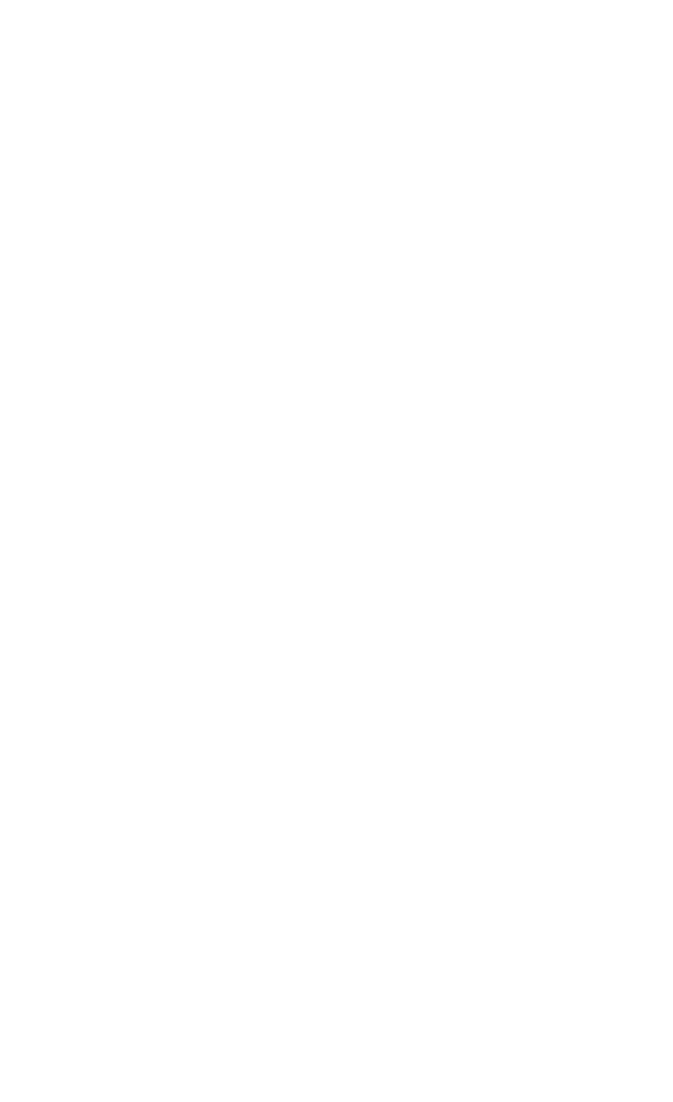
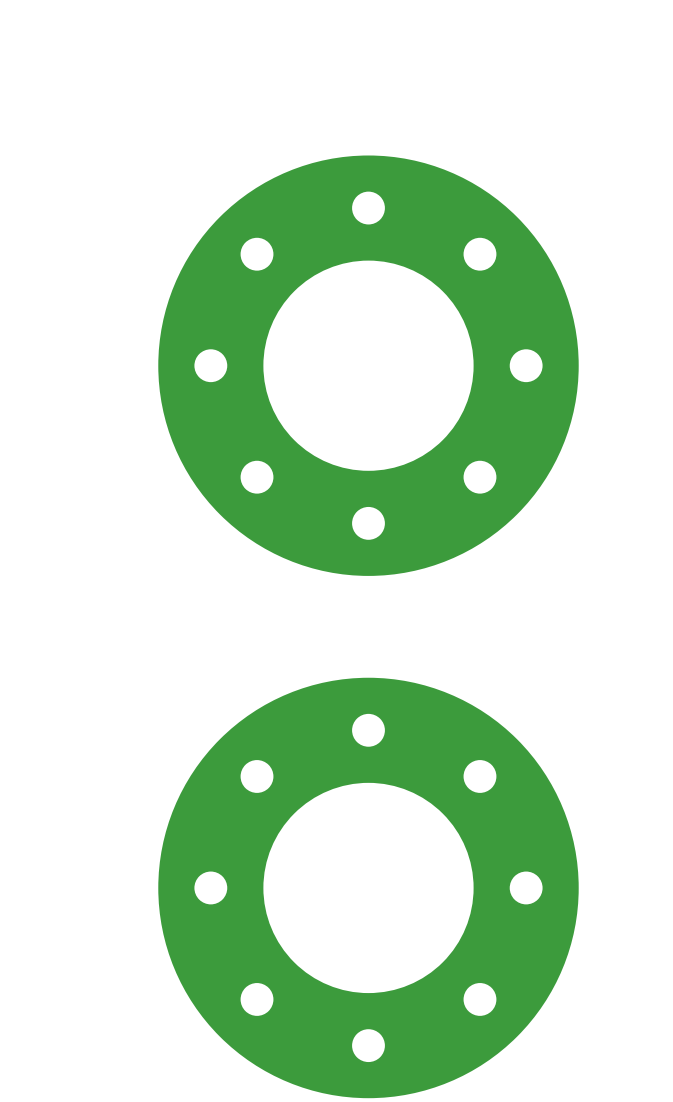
part: none -> (368, 365)
part: none -> (368, 887)

